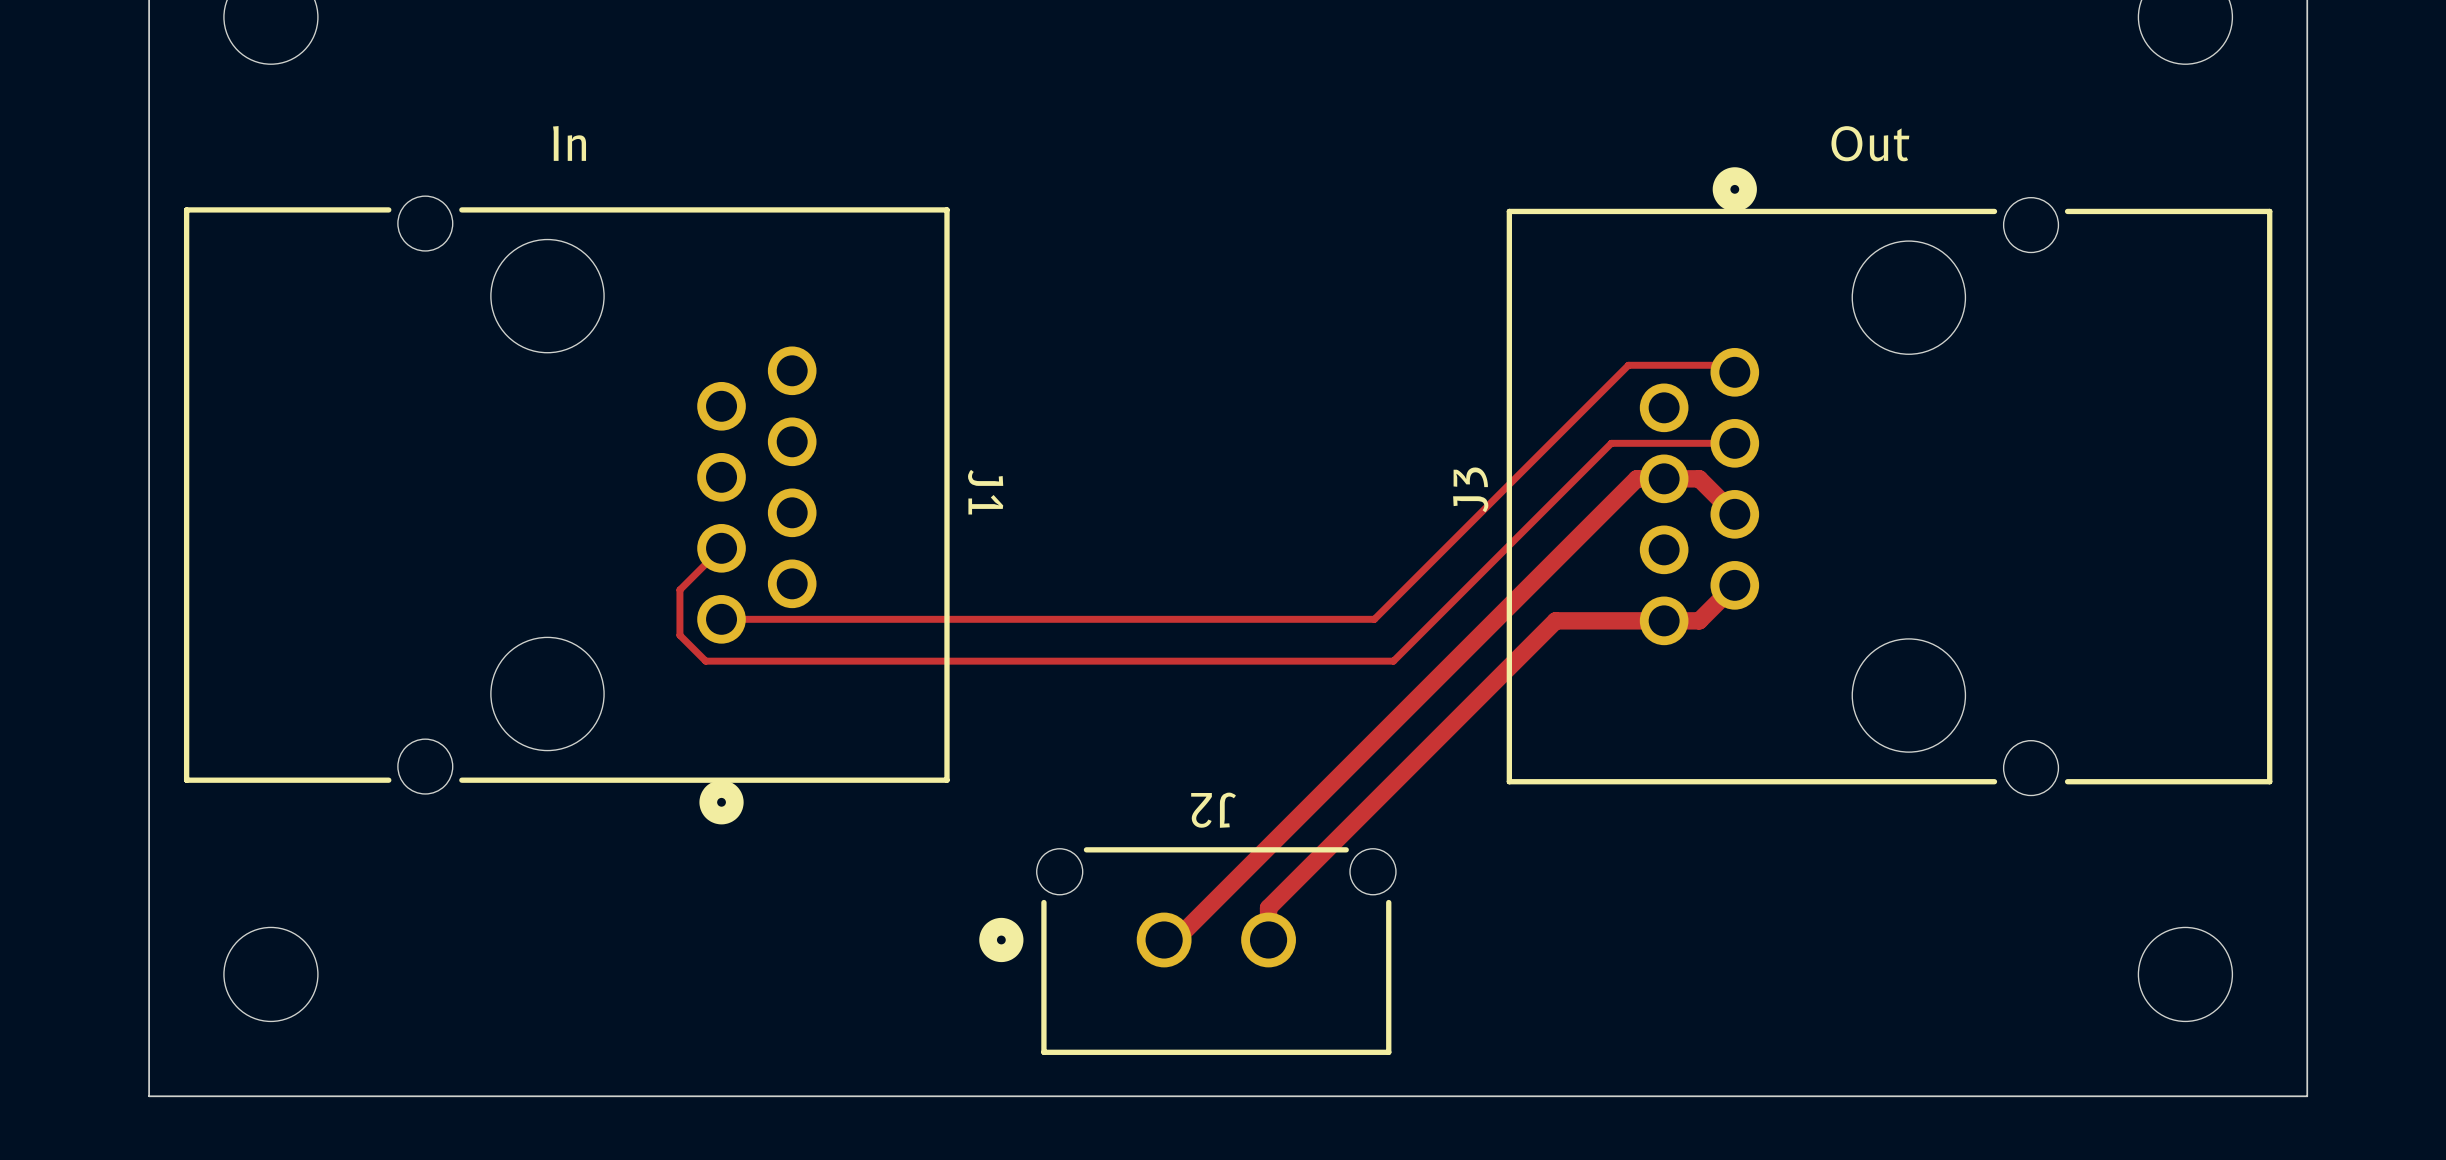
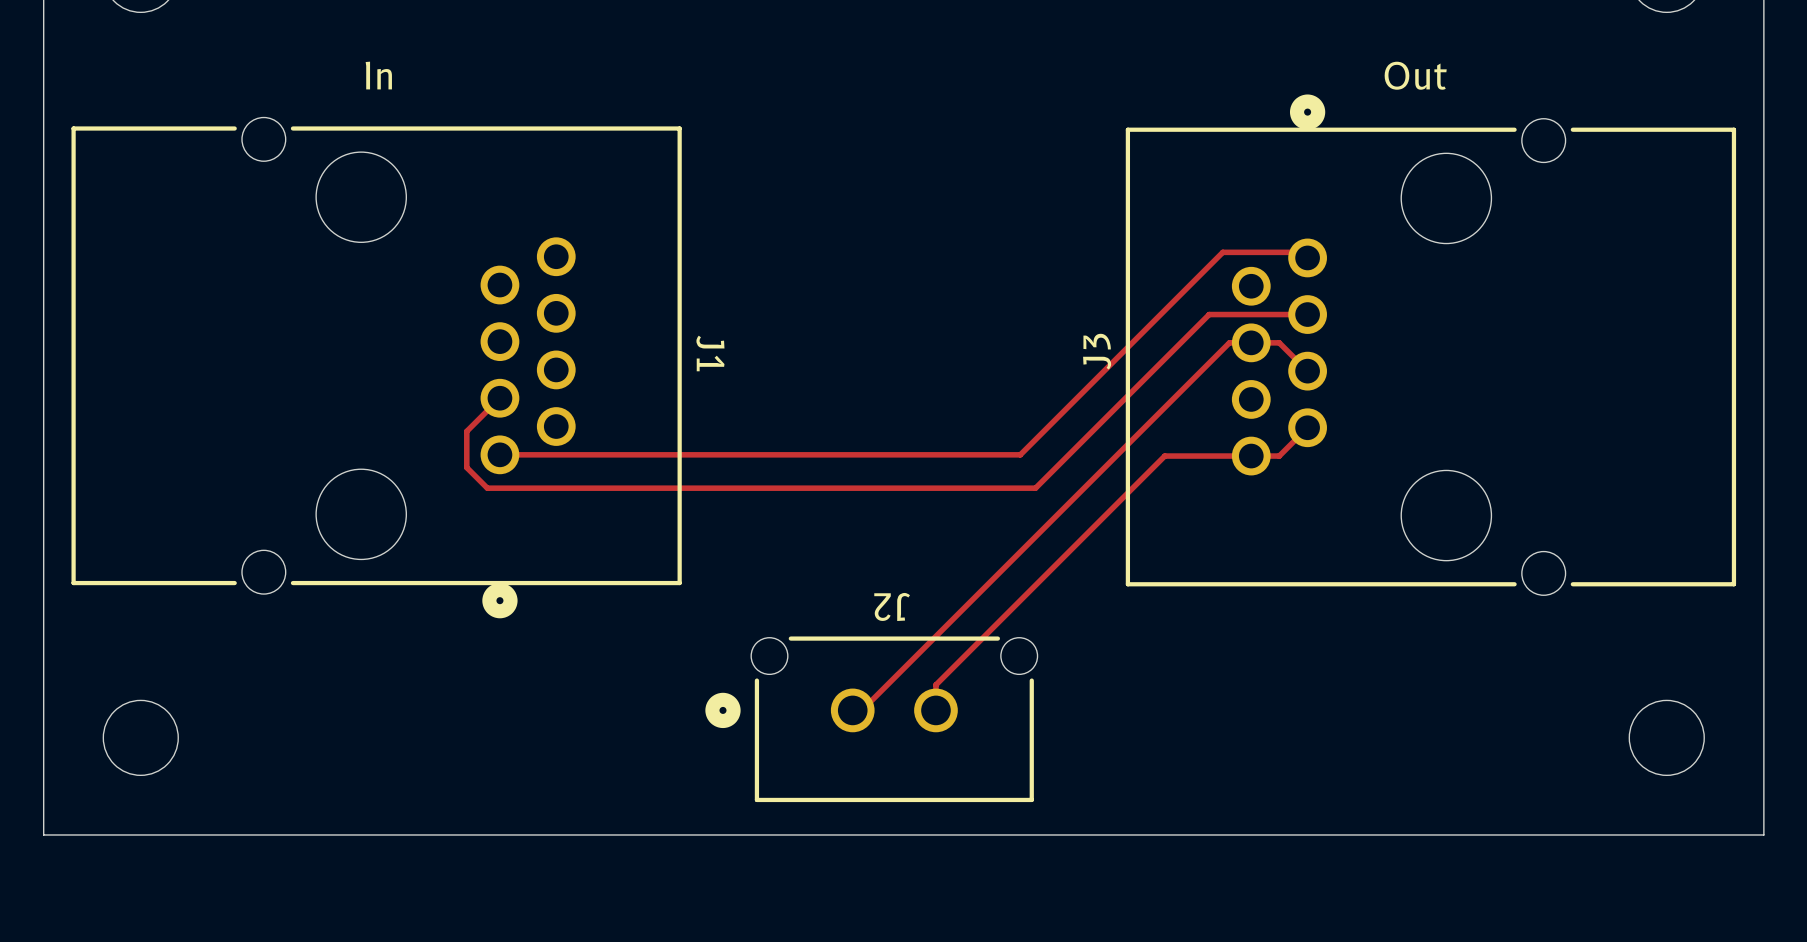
track width: thick (1734, 514) (1699, 478) (1636, 478) (1175, 939) (1164, 939) -> thin (1307, 371) (1279, 342) (1229, 342) (861, 710) (852, 710)
track width: thick (1734, 585) (1699, 620) (1555, 620) (1268, 907) (1268, 939) -> thin (1307, 427) (1279, 456) (1164, 456) (935, 684) (935, 710)

